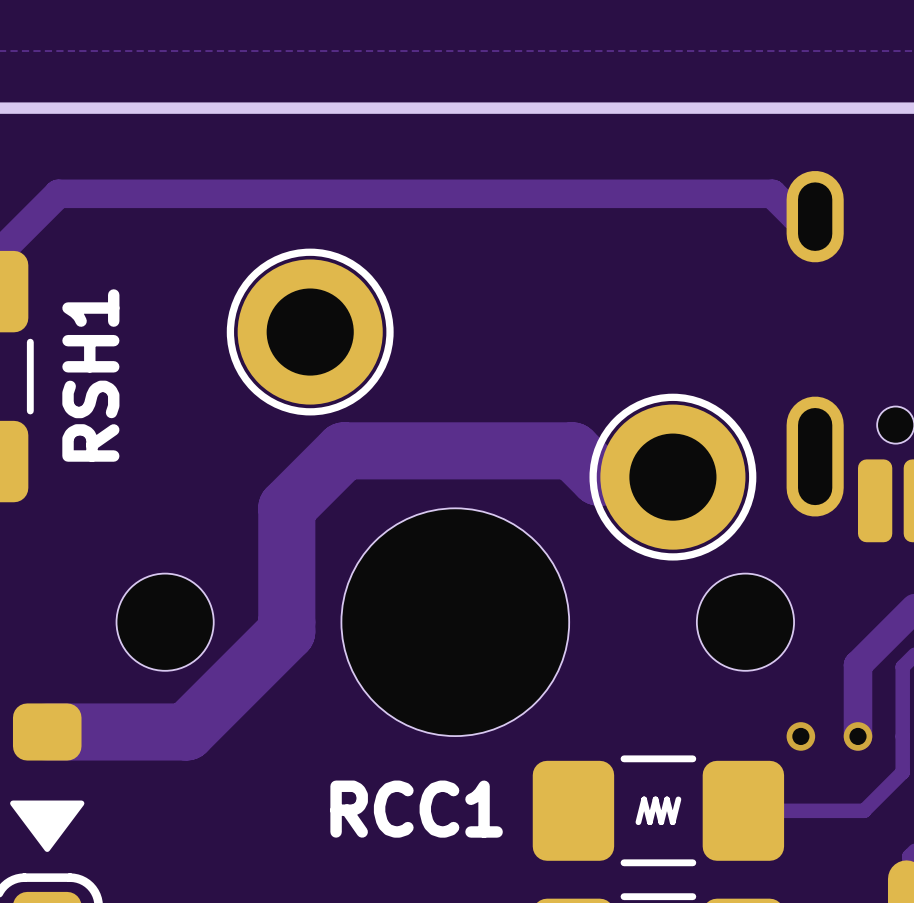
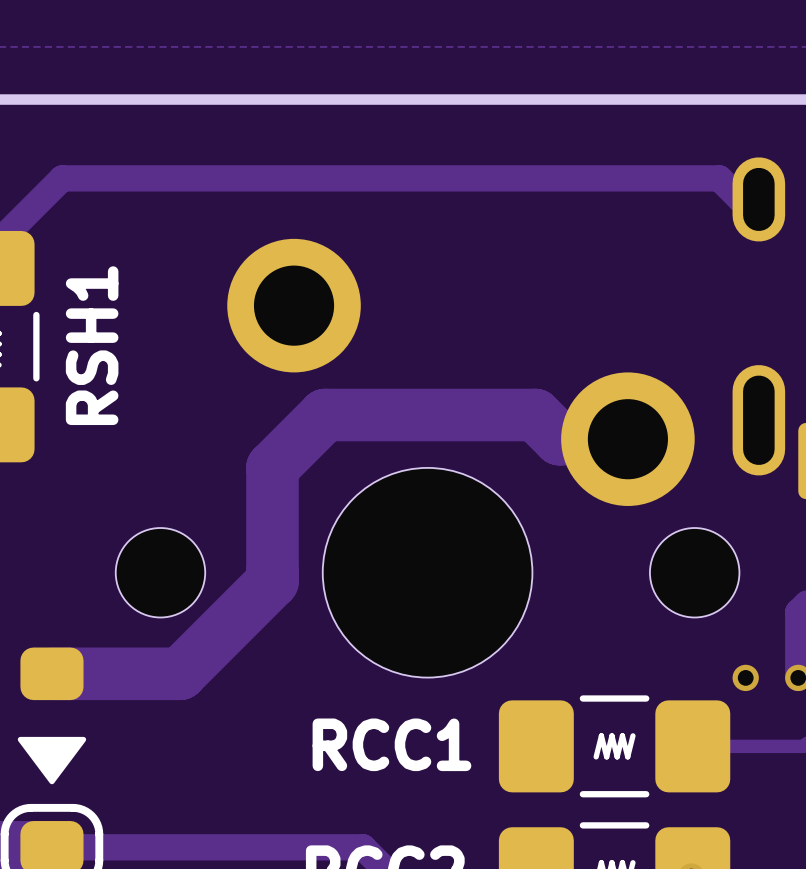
part footprint: [116, 248, 795, 737] -> [115, 238, 740, 678]

